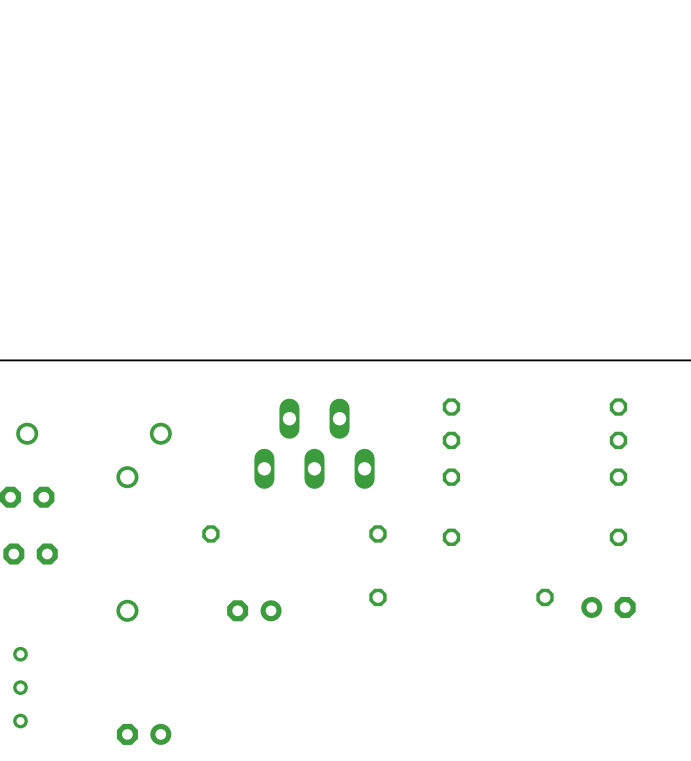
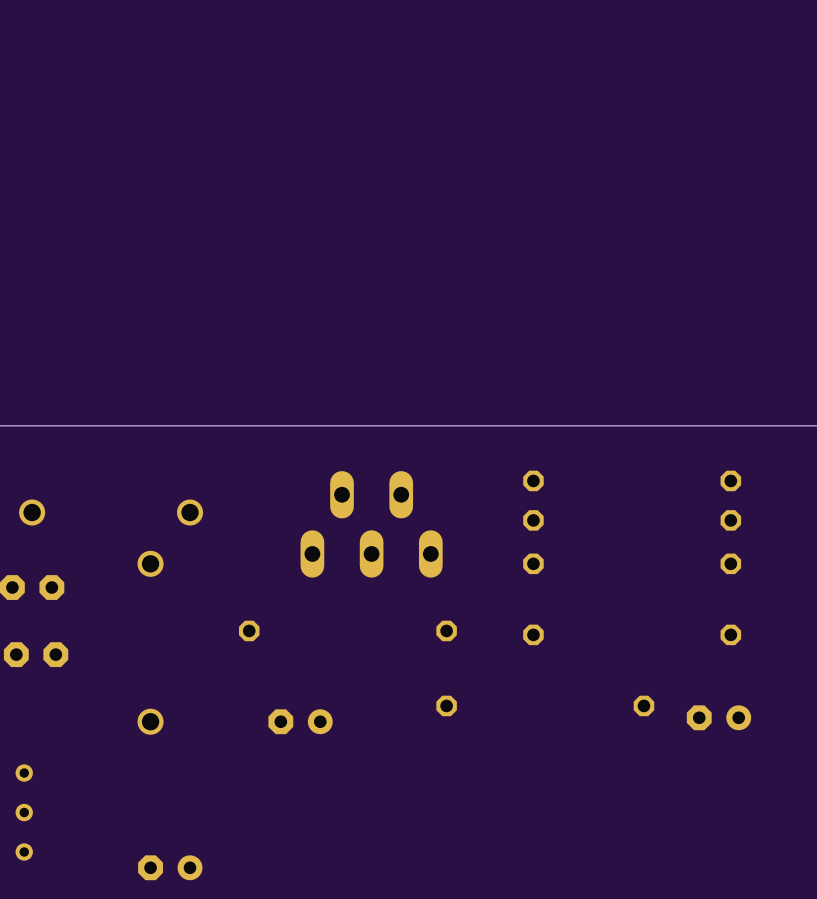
part rotation: 0° (608, 607) -> 180° (718, 717)

